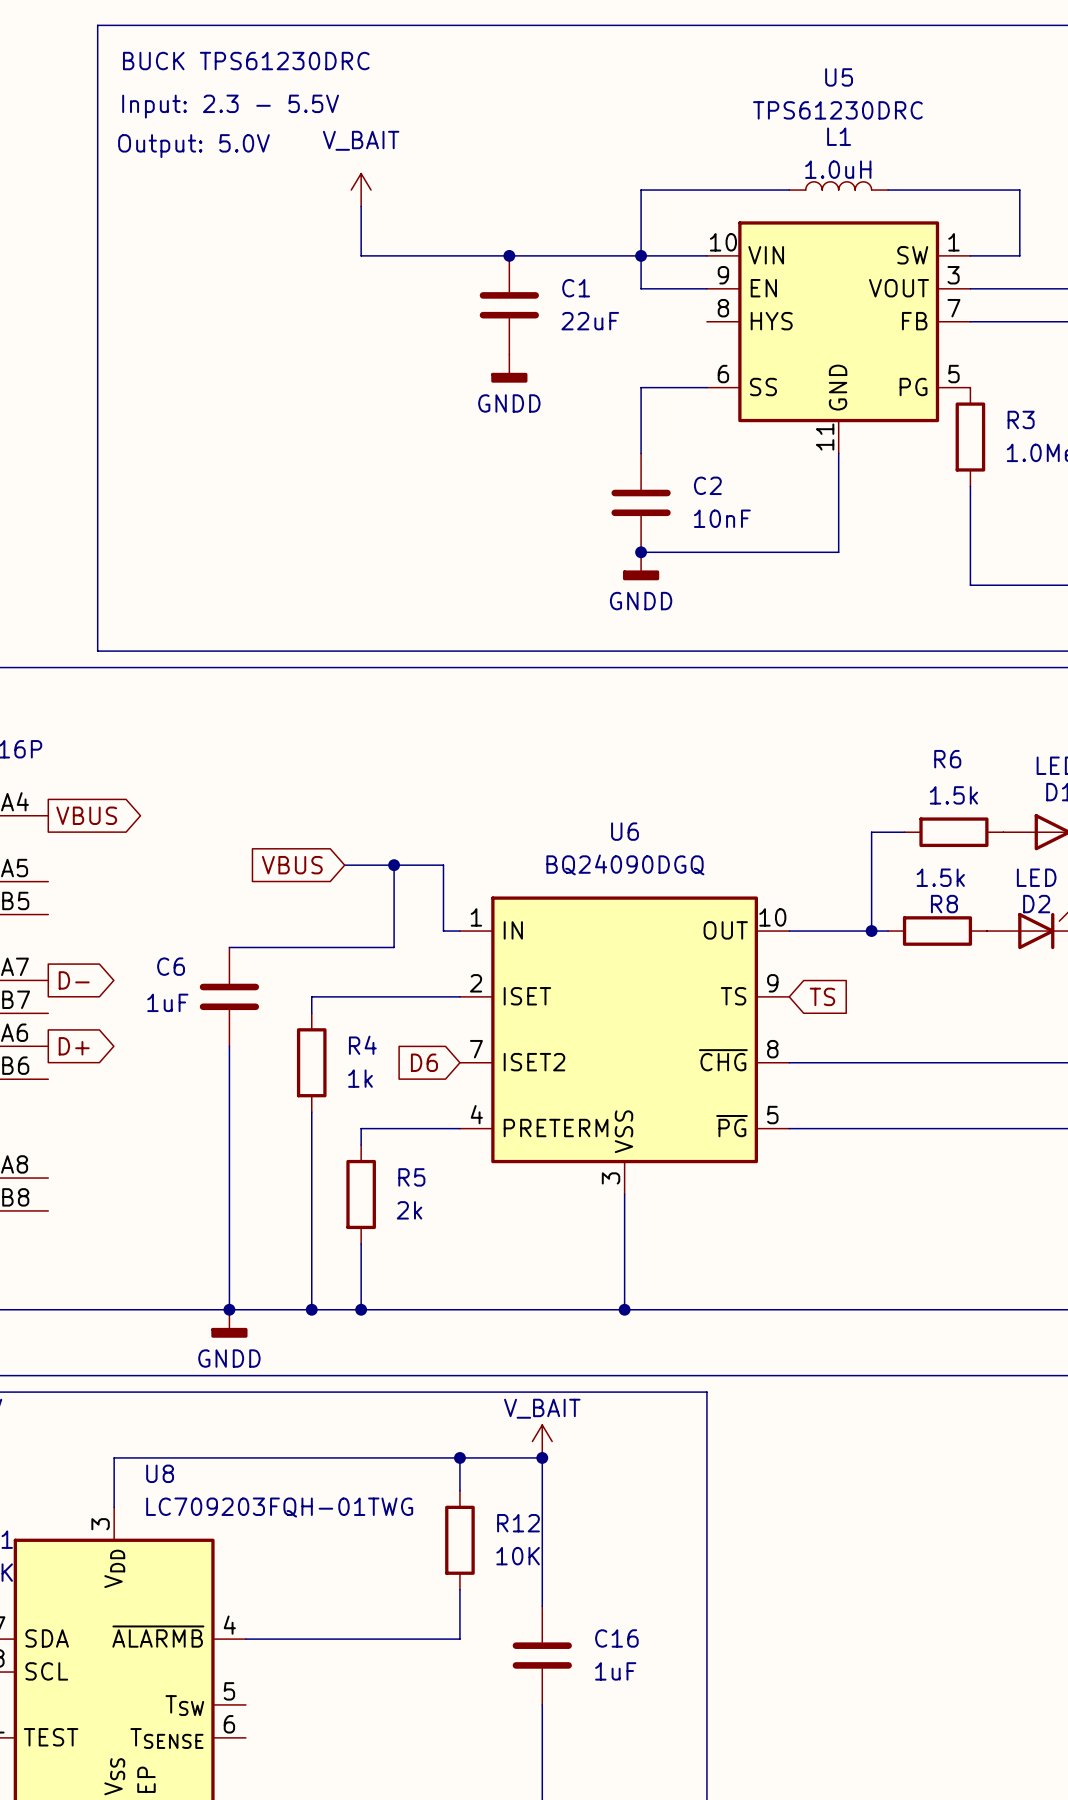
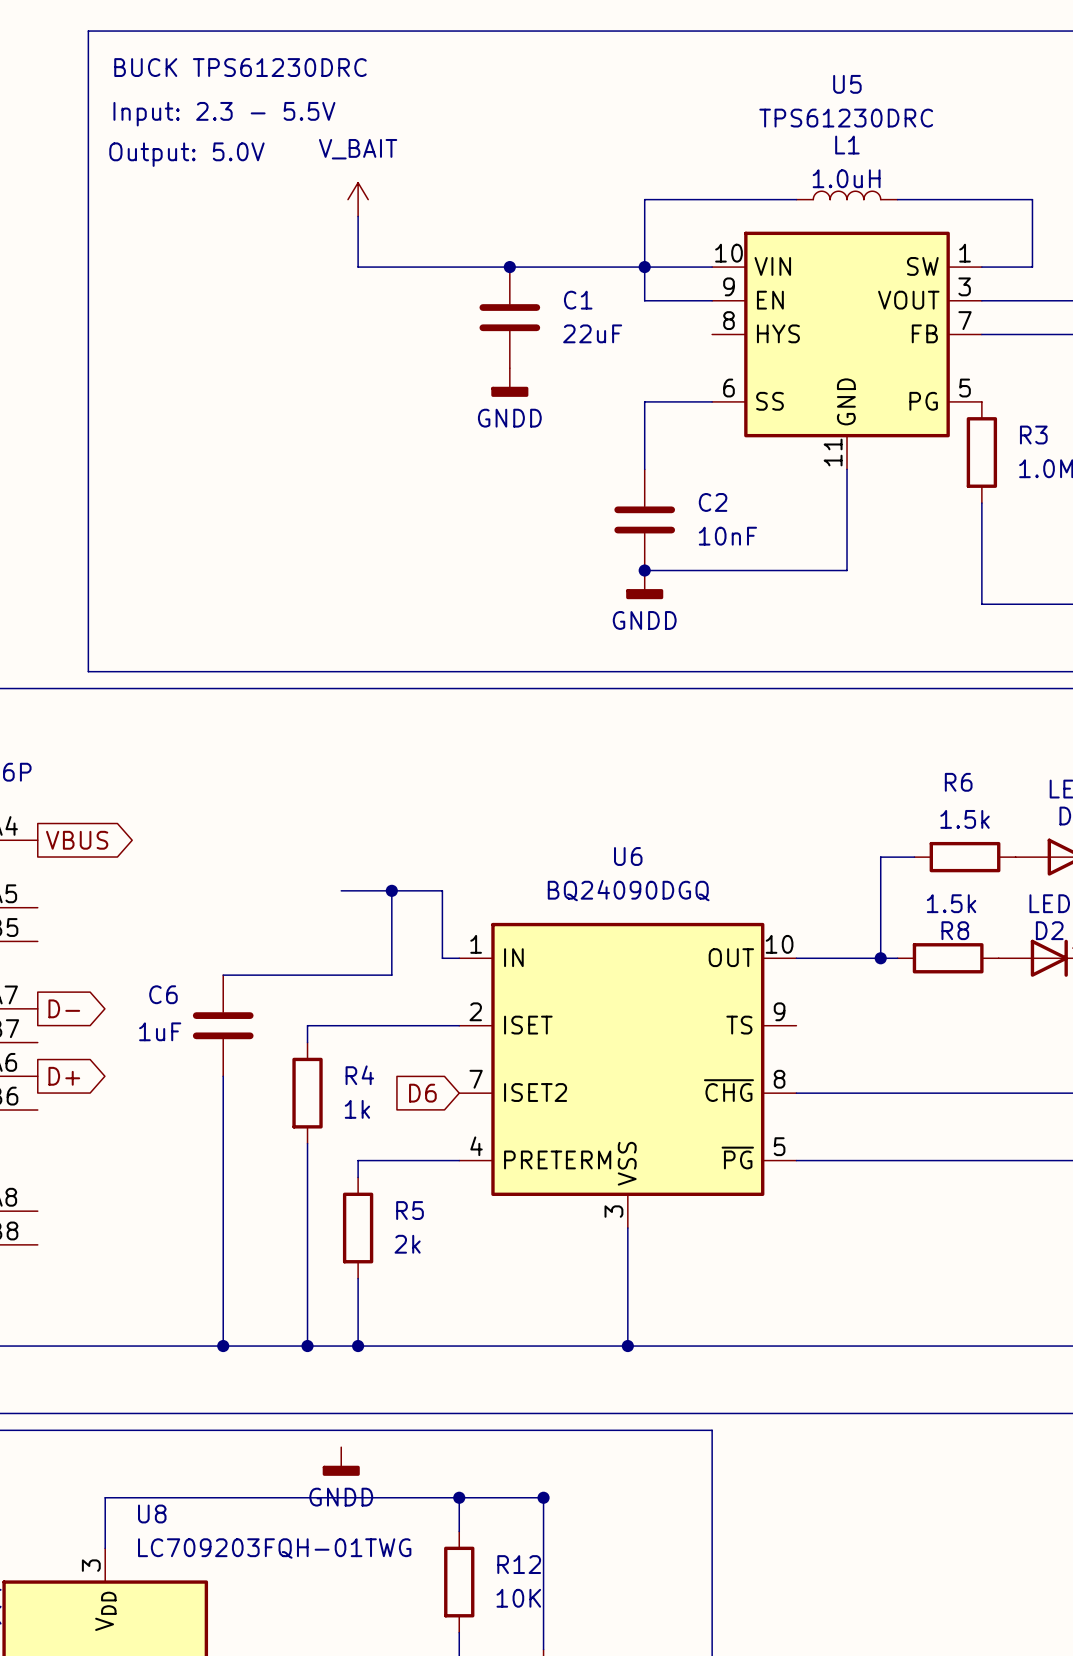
global label: VBUS (292, 865) -> none
global label: TS (822, 996) -> none
power symbol position: GNDD (229, 1323) -> GNDD (341, 1461)
power symbol: V_BAIT (542, 1441) -> none

